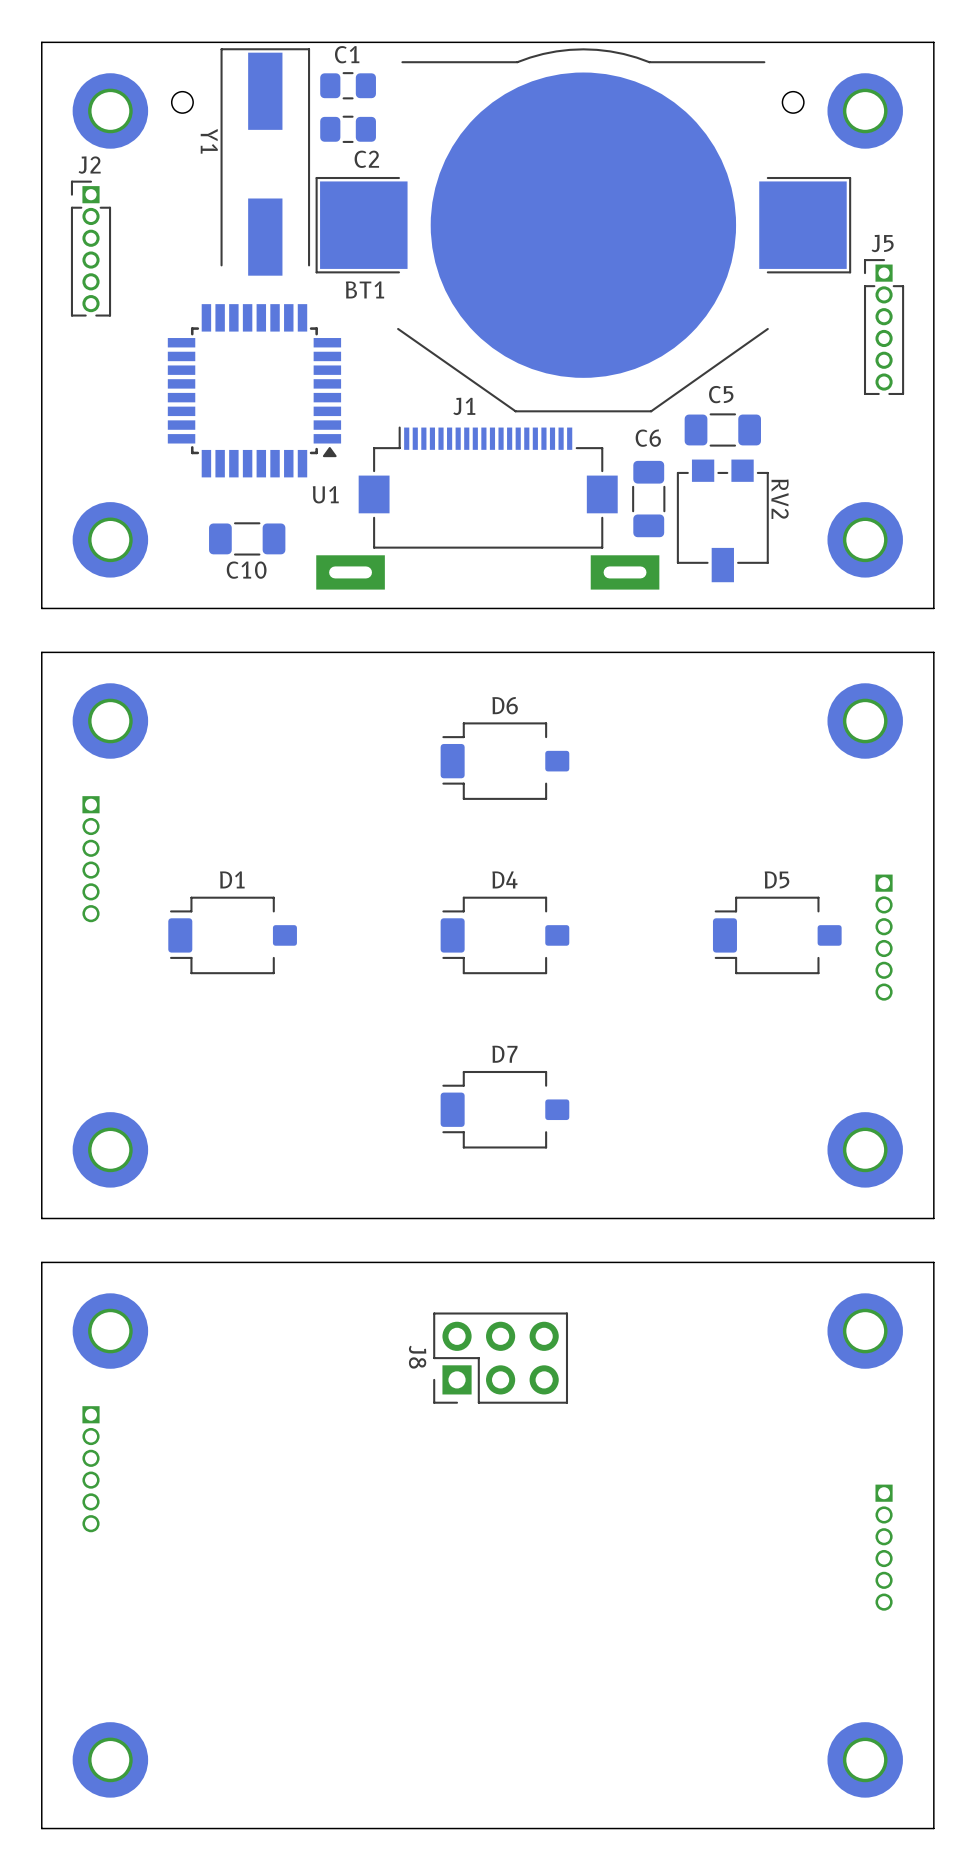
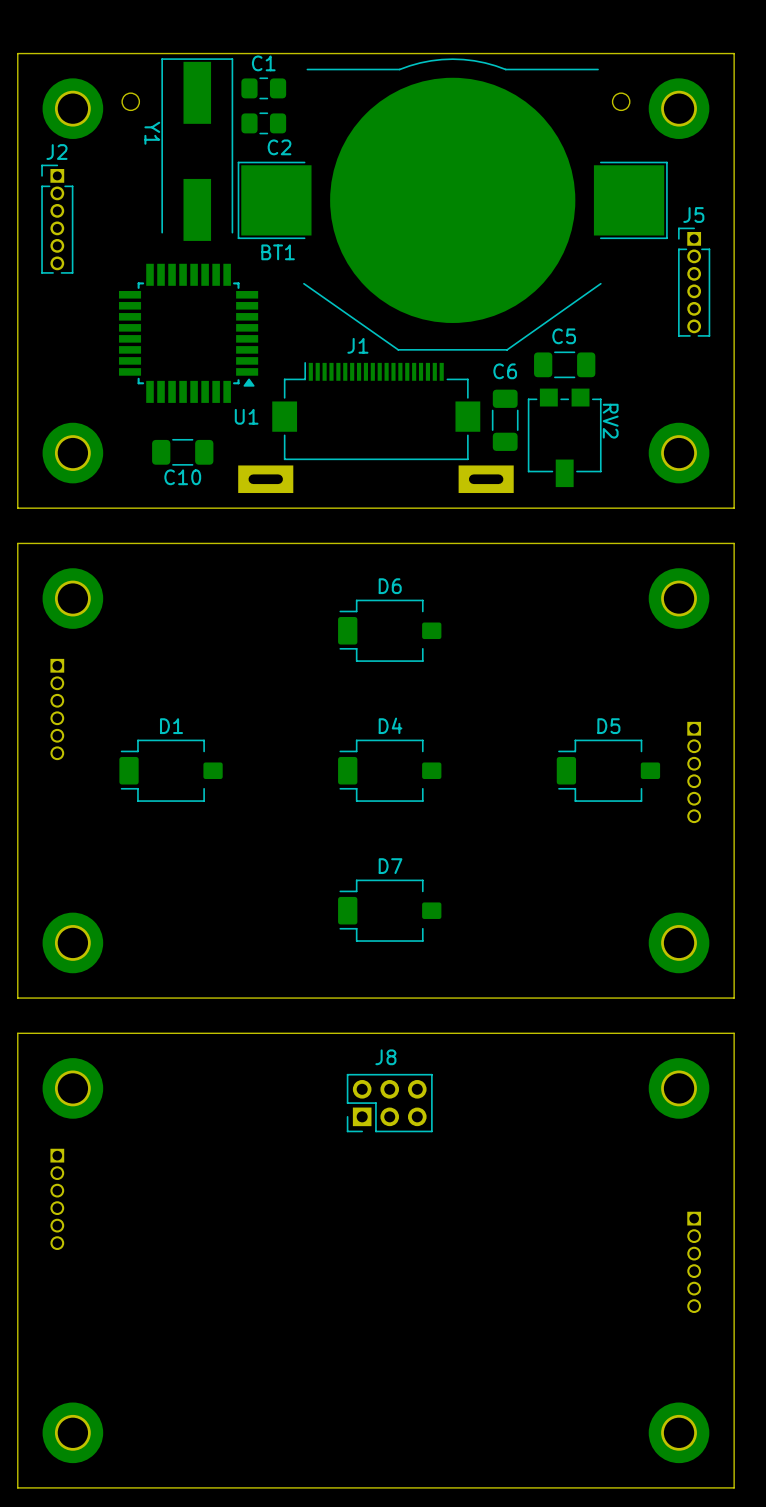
J8 footprint: [433, 1312, 569, 1404] -> [346, 1073, 433, 1133]
J8 name position: J8 (417, 1357) -> J8 (385, 1057)

